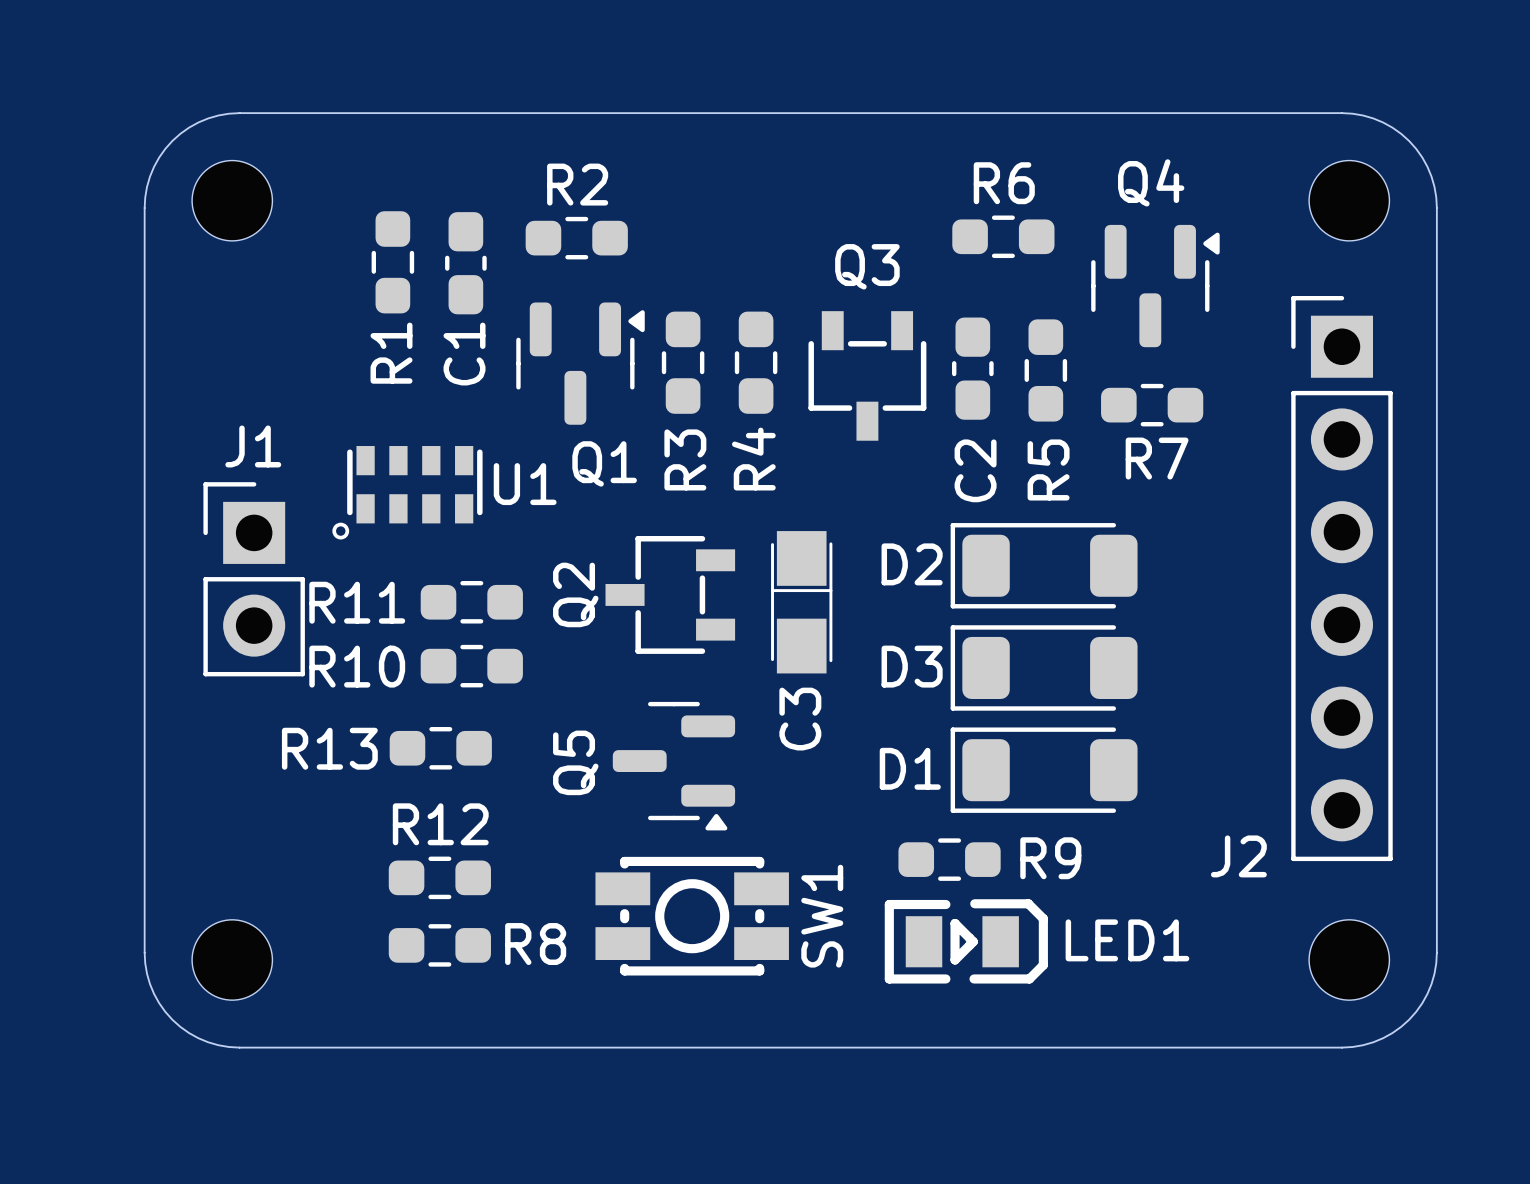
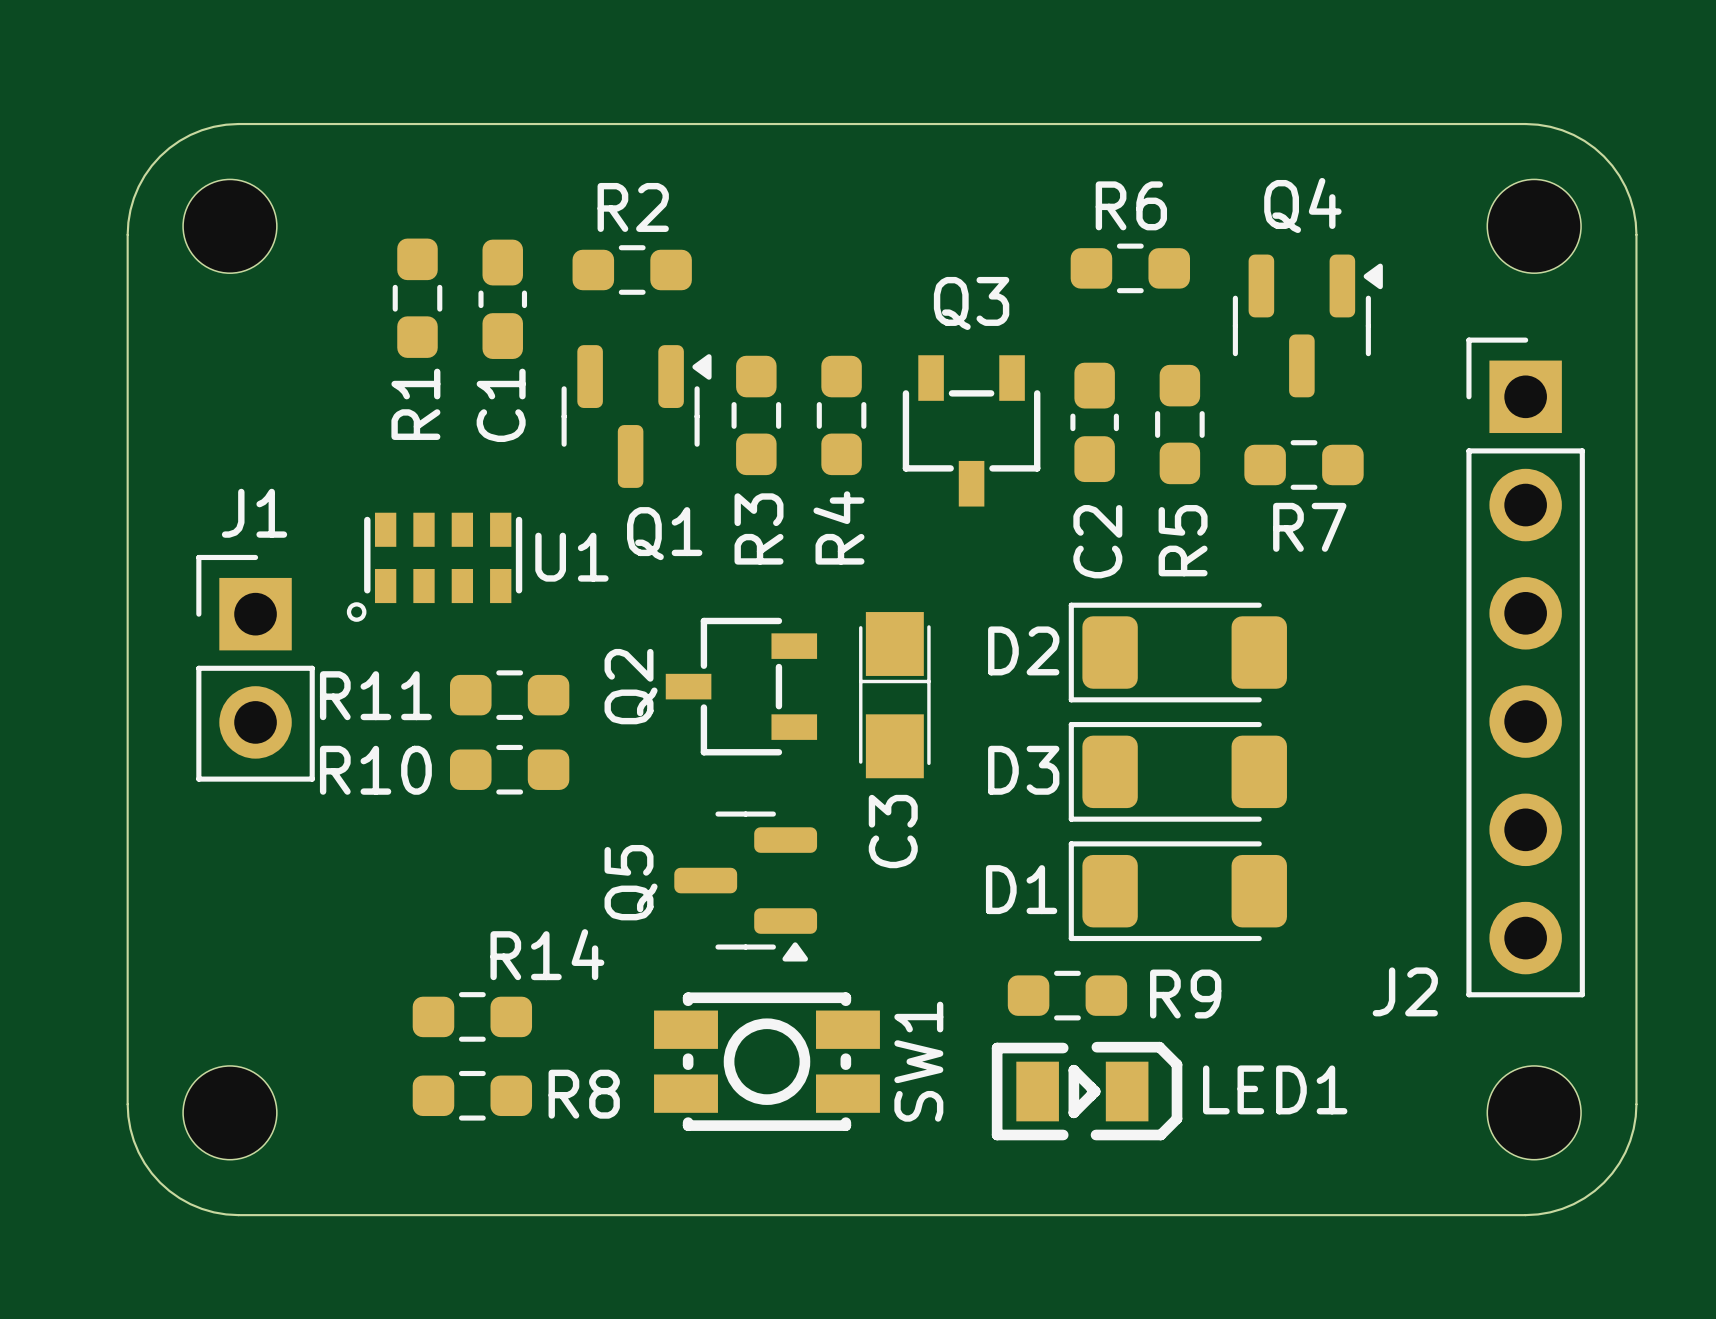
R13: (440, 748) -> none
R12 name: R12 (440, 824) -> R14 (547, 954)

